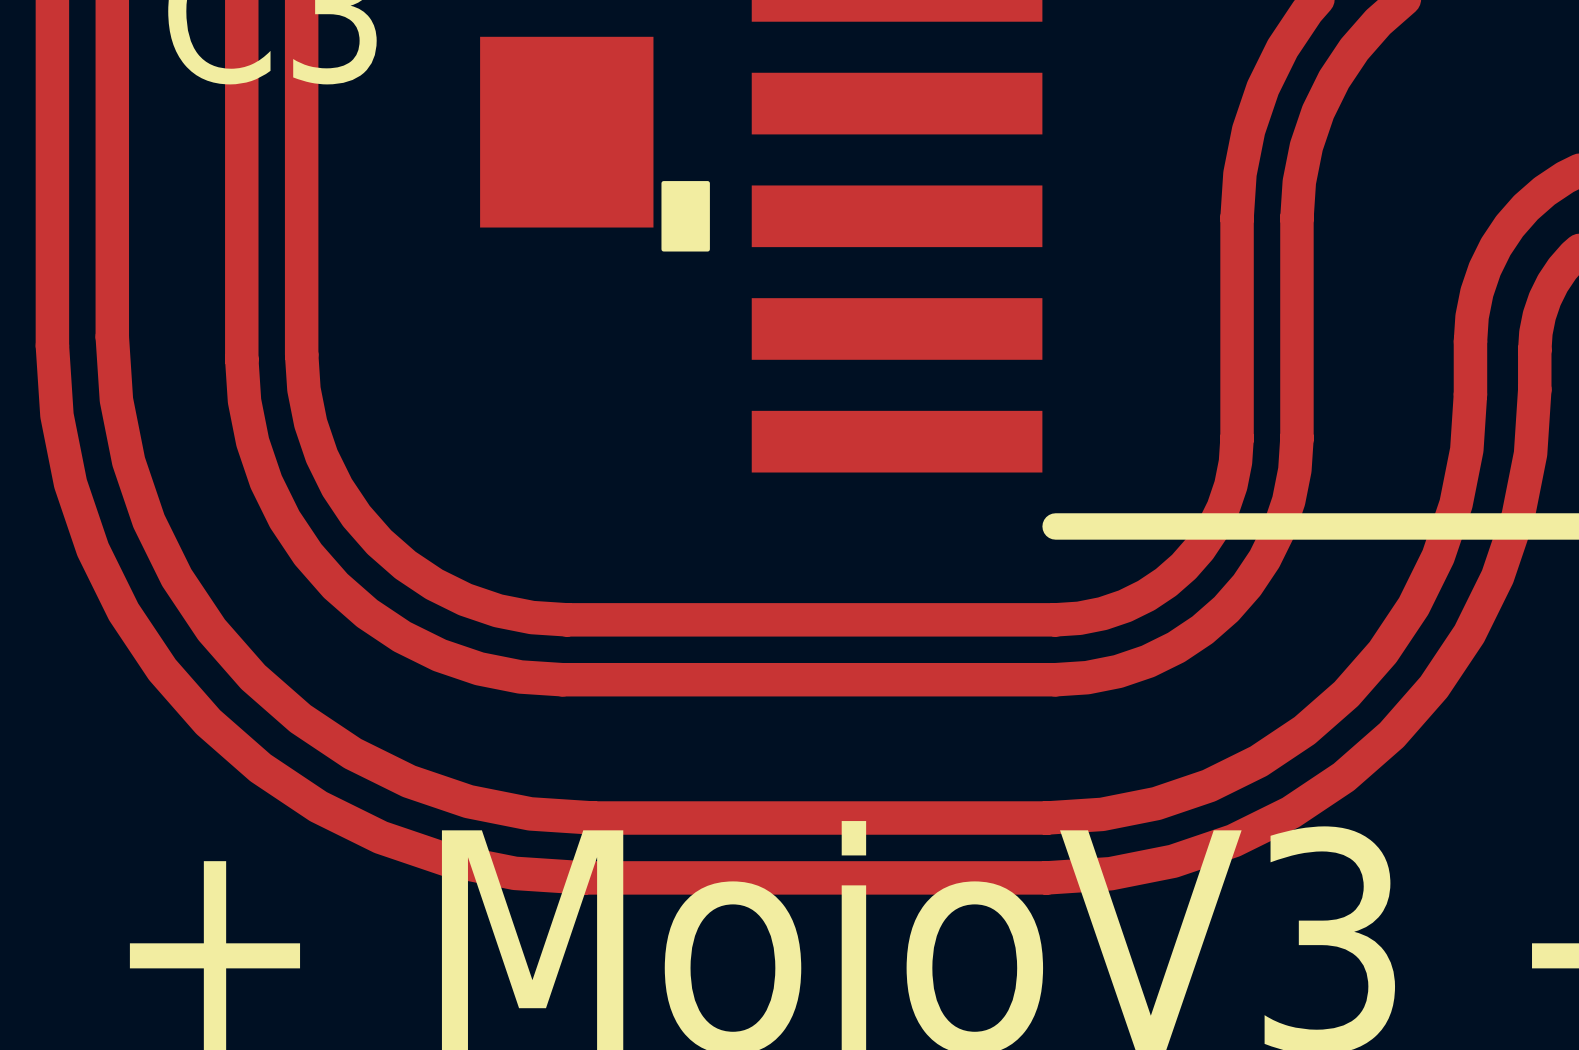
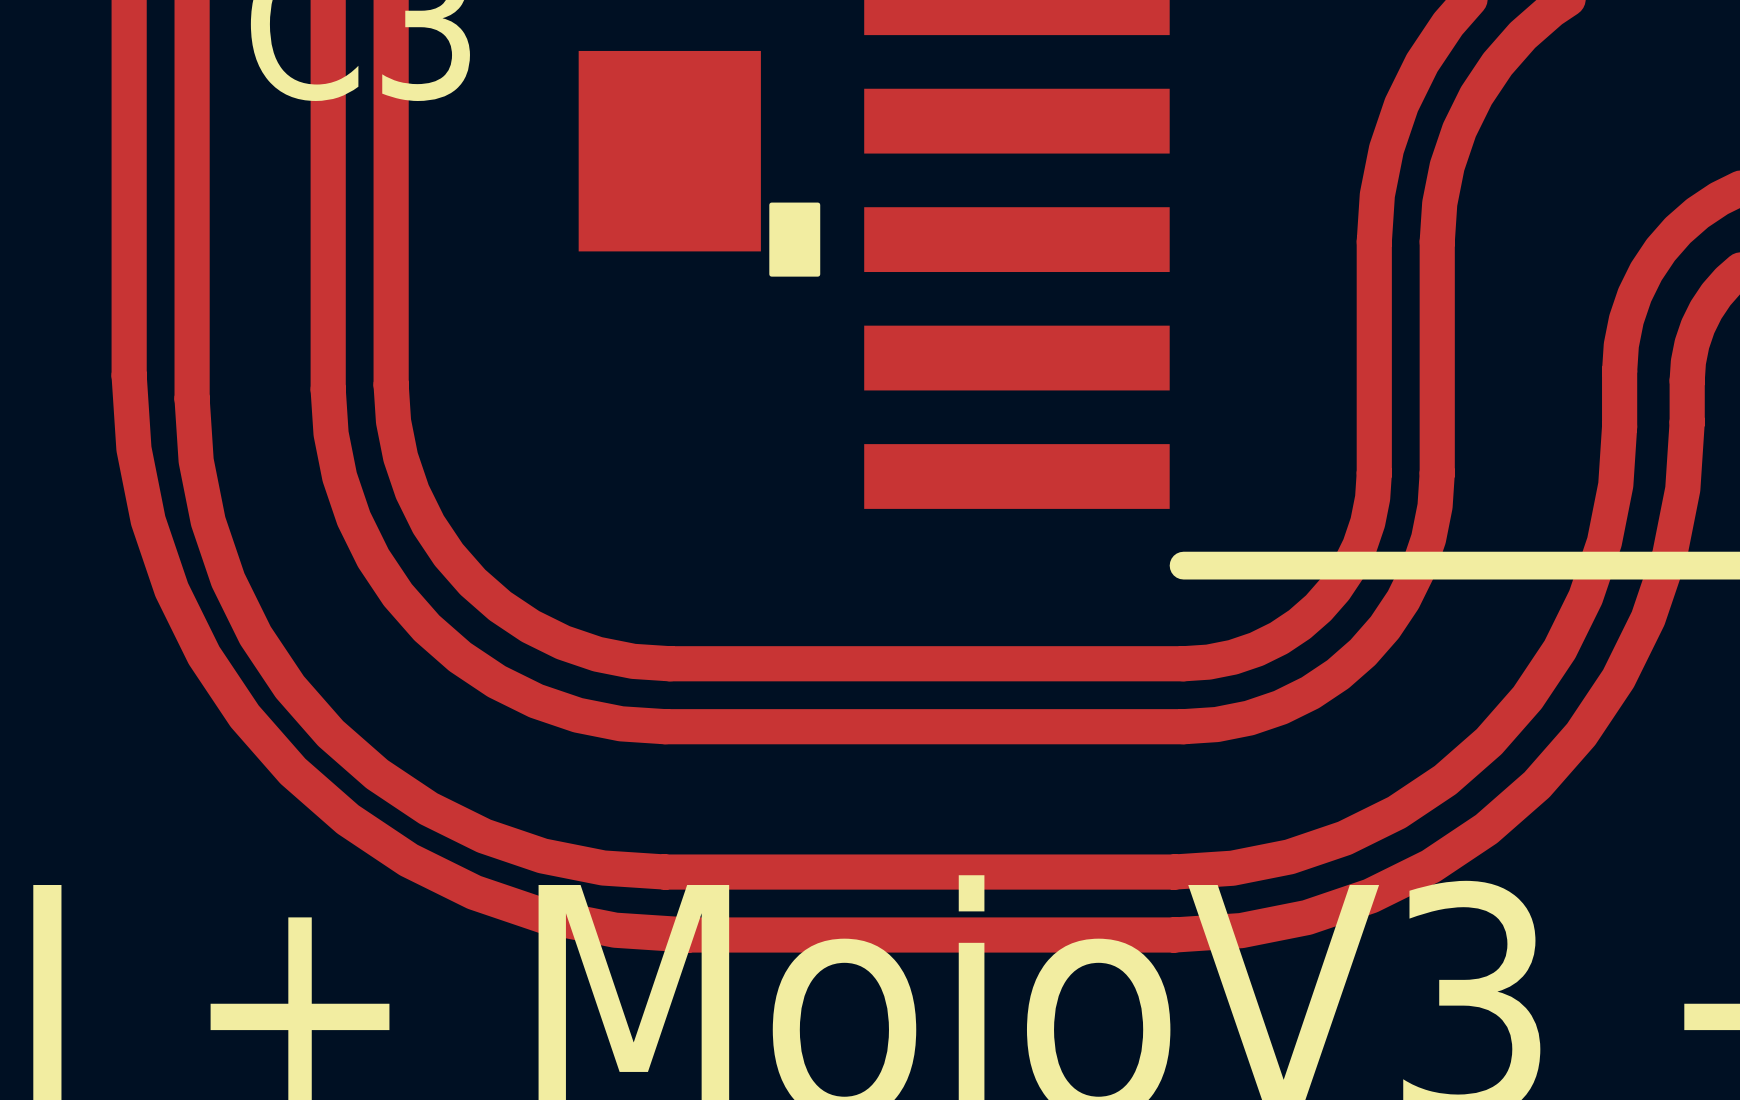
track: (112, 337) (116, 399) (128, 461) (148, 521) (176, 577) (211, 629) (253, 677) (300, 718) (352, 753) (409, 781) (468, 801) (530, 813) (593, 818) -> (192, 366) (196, 460) (208, 521) (228, 580) (255, 635) (289, 686) (330, 733) (377, 774) (428, 808) (484, 836) (542, 855) (603, 867) (697, 872)

